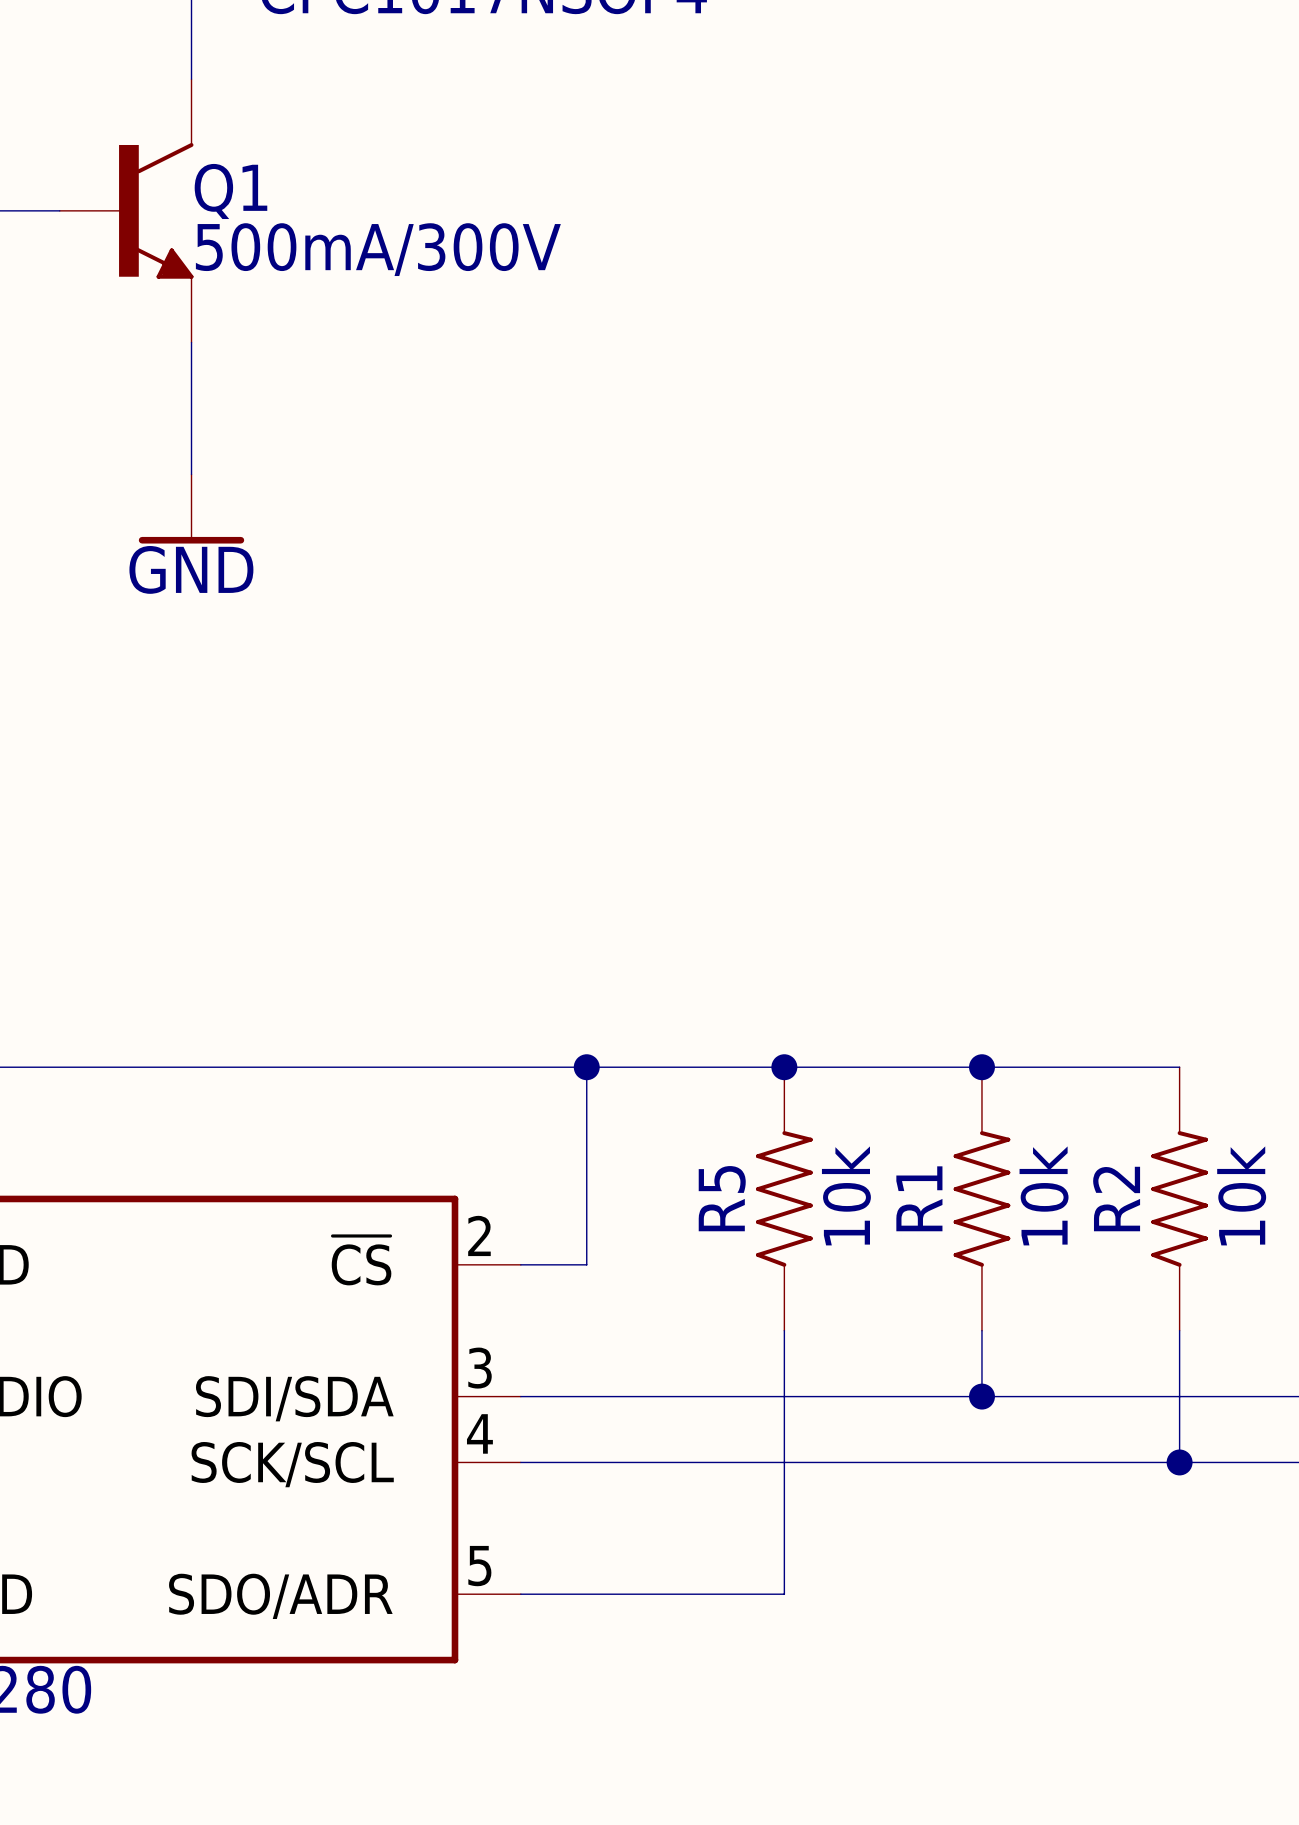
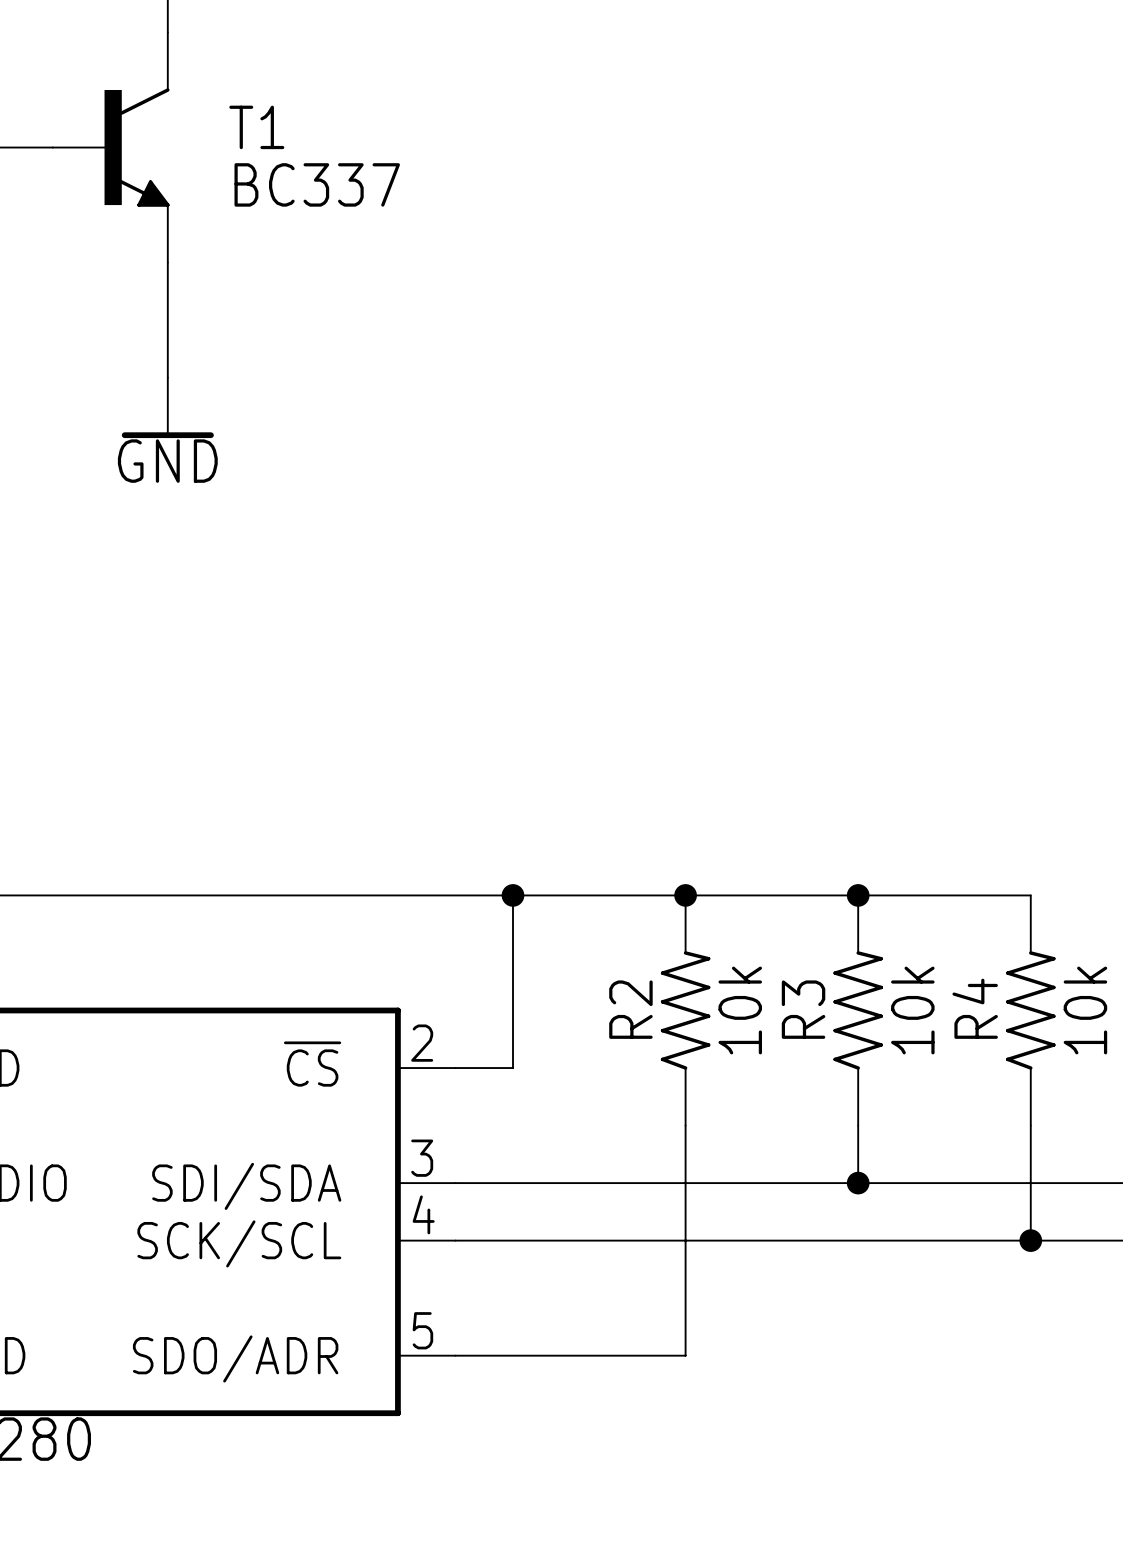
Q1 name: Q1 (230, 191) -> T1 (256, 127)
Q1 value: 500mA/300V (378, 249) -> BC337 (317, 184)
R5 name: R5 (722, 1198) -> R2 (630, 1009)
R1 name: R1 (919, 1198) -> R3 (803, 1009)
R2 name: R2 (1116, 1199) -> R4 (975, 1008)

